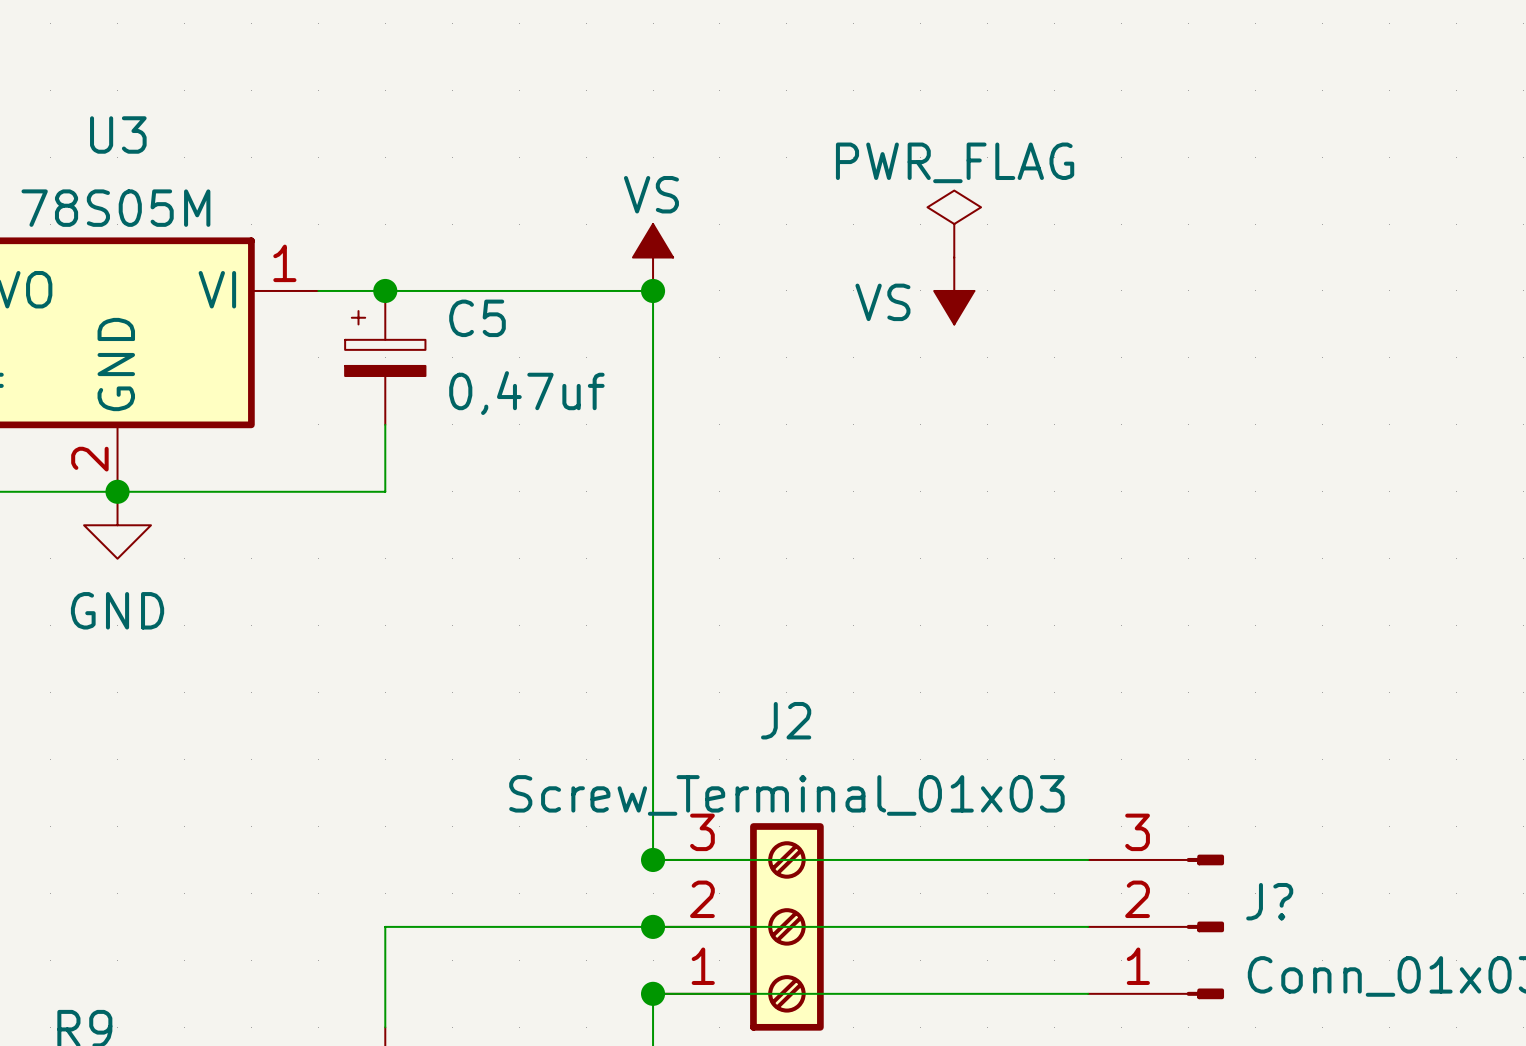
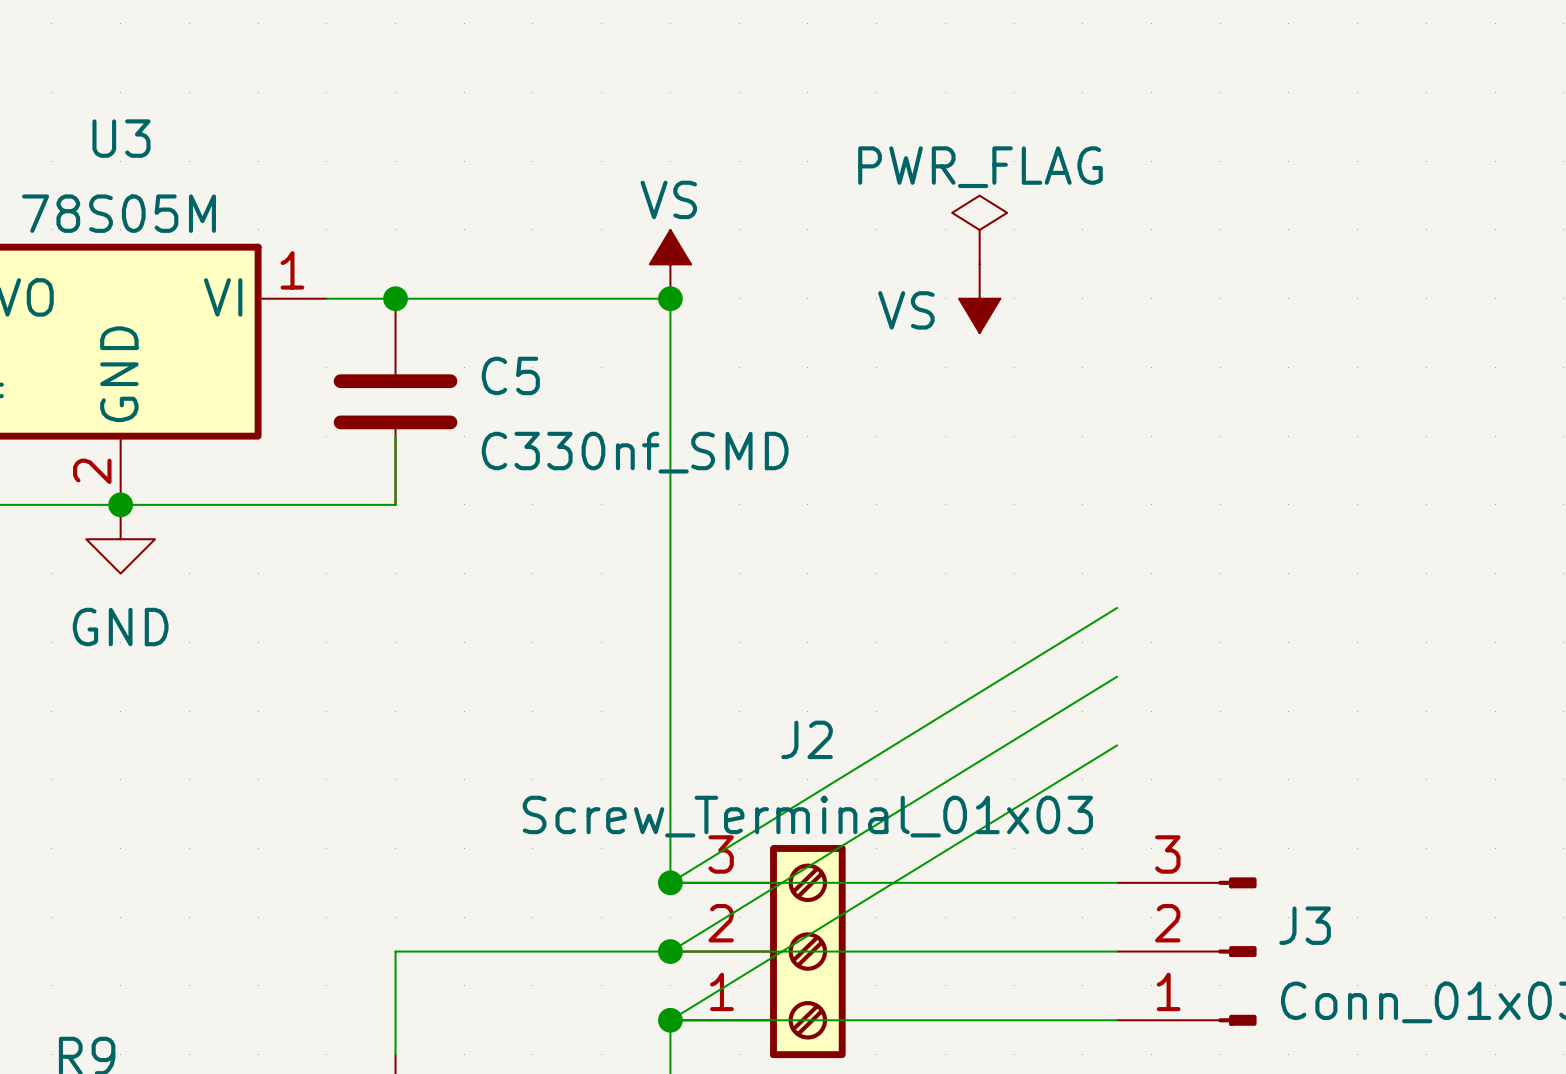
C5 symbol: [345, 290, 426, 425] -> [333, 298, 458, 505]
C5 value: 0,47uf (526, 393) -> C330nf_SMD (635, 452)
wire: none -> (1117, 607) (670, 882)
wire: none -> (1117, 676) (670, 951)
wire: none -> (1117, 745) (670, 1020)
J? name: J? (1269, 901) -> J3 (1305, 925)

